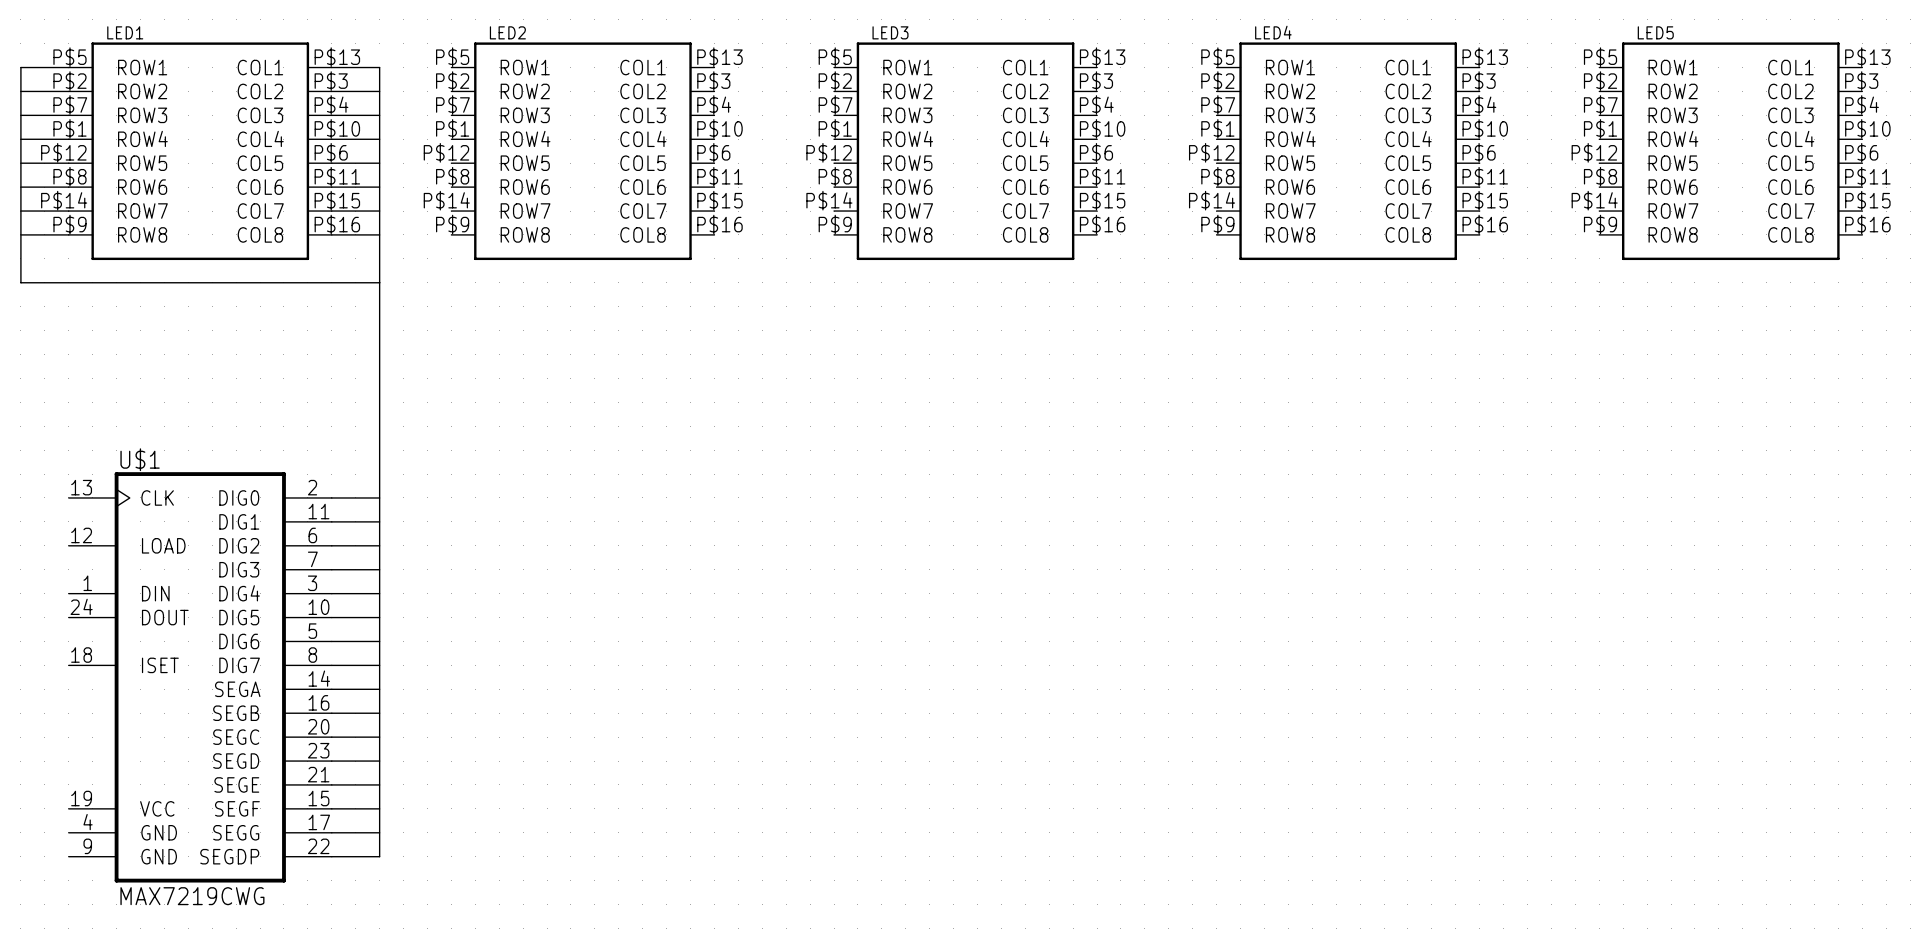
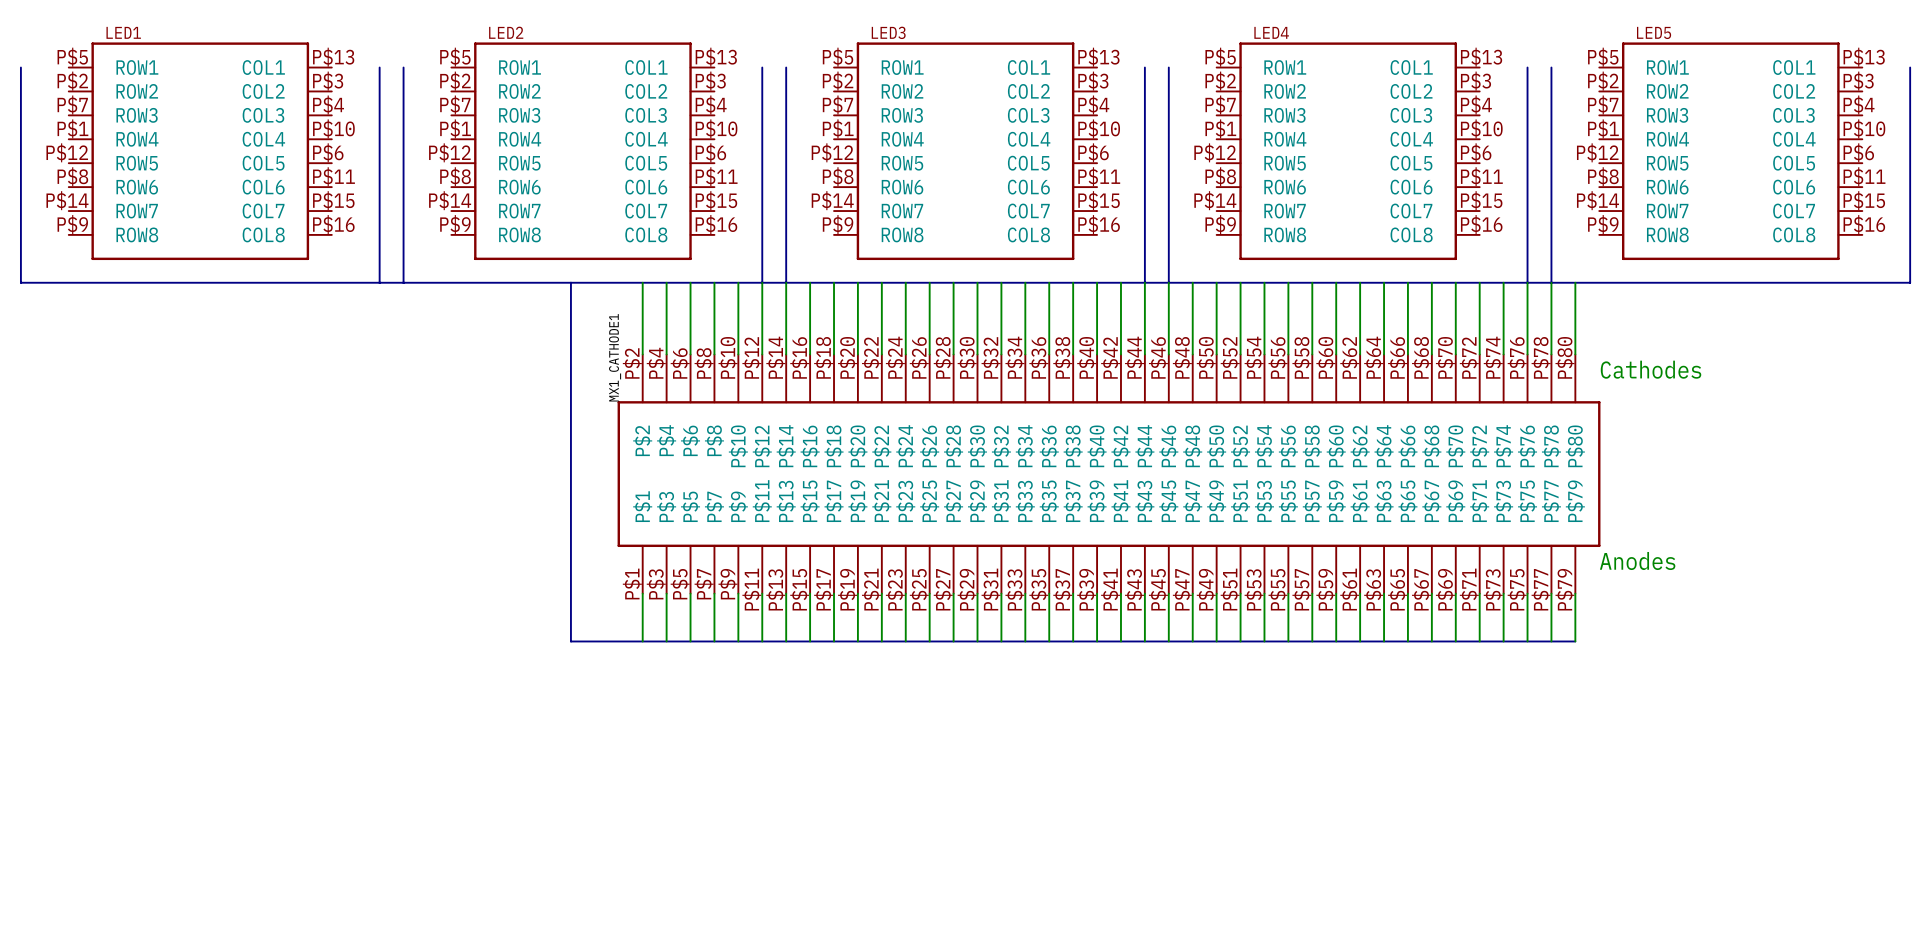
wire: (20, 67) (68, 67) -> none
wire: (331, 67) (379, 67) -> none
bus: none -> (403, 67) (403, 282)
bus: none -> (762, 67) (762, 282)
bus: none -> (786, 67) (786, 282)
bus: none -> (1144, 67) (1144, 282)
bus: none -> (1168, 67) (1168, 282)
bus: none -> (1527, 67) (1527, 282)
bus: none -> (1551, 67) (1551, 282)
wire: (20, 91) (68, 91) -> none
wire: (331, 91) (379, 91) -> none
wire: (20, 115) (68, 115) -> none
wire: (331, 115) (379, 115) -> none
wire: (20, 139) (68, 139) -> none
wire: (331, 139) (379, 139) -> none
wire: (20, 163) (68, 163) -> none
wire: (331, 163) (379, 163) -> none
wire: (20, 187) (68, 187) -> none
wire: (331, 187) (379, 187) -> none
wire: (20, 211) (68, 211) -> none
wire: (331, 211) (379, 211) -> none
wire: (20, 234) (68, 234) -> none
wire: (331, 234) (379, 234) -> none
bus: (379, 282) (379, 856) -> (379, 282) (1910, 282) (1910, 67)
bus: none -> (570, 282) (570, 641) (1575, 641)
wire: none -> (642, 282) (642, 354)
wire: none -> (666, 282) (666, 354)
wire: none -> (690, 282) (690, 354)
wire: none -> (714, 282) (714, 354)
wire: none -> (738, 282) (738, 354)
wire: none -> (762, 282) (762, 354)
wire: none -> (786, 282) (786, 354)
wire: none -> (810, 282) (810, 354)
wire: none -> (834, 282) (834, 354)
wire: none -> (857, 282) (857, 354)
wire: none -> (881, 282) (881, 354)
wire: none -> (905, 282) (905, 354)
wire: none -> (929, 282) (929, 354)
wire: none -> (953, 282) (953, 354)
wire: none -> (977, 282) (977, 354)
wire: none -> (1001, 282) (1001, 354)
wire: none -> (1025, 282) (1025, 354)
wire: none -> (1049, 282) (1049, 354)
wire: none -> (1073, 282) (1073, 354)
wire: none -> (1097, 282) (1097, 354)
wire: none -> (1120, 282) (1120, 354)
wire: none -> (1144, 282) (1144, 354)
wire: none -> (1168, 282) (1168, 354)
wire: none -> (1192, 282) (1192, 354)
wire: none -> (1216, 282) (1216, 354)
wire: none -> (1240, 282) (1240, 354)
wire: none -> (1264, 282) (1264, 354)
wire: none -> (1288, 282) (1288, 354)
wire: none -> (1312, 282) (1312, 354)
wire: none -> (1336, 282) (1336, 354)
wire: none -> (1360, 282) (1360, 354)
wire: none -> (1384, 282) (1384, 354)
wire: none -> (1407, 282) (1407, 354)
wire: none -> (1431, 282) (1431, 354)
wire: none -> (1455, 282) (1455, 354)
wire: none -> (1479, 282) (1479, 354)
wire: none -> (1503, 282) (1503, 354)
wire: none -> (1527, 282) (1527, 354)
wire: none -> (1551, 282) (1551, 354)
wire: none -> (1575, 282) (1575, 354)
label: none -> MX1_CATHODE1 (615, 357)
text: none -> Cathodes (1651, 369)
part: none -> (1109, 474)
wire: (331, 497) (379, 497) -> none
wire: (331, 521) (379, 521) -> none
wire: (331, 545) (379, 545) -> none
text: none -> Anodes (1637, 561)
wire: (331, 569) (379, 569) -> none
wire: (331, 593) (379, 593) -> none
wire: none -> (642, 593) (642, 641)
wire: none -> (666, 593) (666, 641)
wire: none -> (690, 593) (690, 641)
wire: none -> (714, 593) (714, 641)
wire: none -> (738, 593) (738, 641)
wire: none -> (762, 593) (762, 641)
wire: none -> (786, 593) (786, 641)
wire: none -> (810, 593) (810, 641)
wire: none -> (834, 593) (834, 641)
wire: none -> (857, 593) (857, 641)
wire: none -> (881, 593) (881, 641)
wire: none -> (905, 593) (905, 641)
wire: none -> (929, 593) (929, 641)
wire: none -> (953, 593) (953, 641)
wire: none -> (977, 593) (977, 641)
wire: none -> (1001, 593) (1001, 641)
wire: none -> (1025, 593) (1025, 641)
wire: none -> (1049, 593) (1049, 641)
wire: none -> (1073, 593) (1073, 641)
wire: none -> (1097, 593) (1097, 641)
wire: none -> (1120, 593) (1120, 641)
wire: none -> (1144, 593) (1144, 641)
wire: none -> (1168, 593) (1168, 641)
wire: none -> (1192, 593) (1192, 641)
wire: none -> (1216, 593) (1216, 641)
wire: none -> (1240, 593) (1240, 641)
wire: none -> (1264, 593) (1264, 641)
wire: none -> (1288, 593) (1288, 641)
wire: none -> (1312, 593) (1312, 641)
wire: none -> (1336, 593) (1336, 641)
wire: none -> (1360, 593) (1360, 641)
wire: none -> (1384, 593) (1384, 641)
wire: none -> (1407, 593) (1407, 641)
wire: none -> (1431, 593) (1431, 641)
wire: none -> (1455, 593) (1455, 641)
wire: none -> (1479, 593) (1479, 641)
wire: none -> (1503, 593) (1503, 641)
wire: none -> (1527, 593) (1527, 641)
wire: none -> (1551, 593) (1551, 641)
wire: none -> (1575, 593) (1575, 641)
wire: (331, 617) (379, 617) -> none
wire: (331, 641) (379, 641) -> none
wire: (331, 665) (379, 665) -> none
U$1: MAX7219CWG (200, 677) -> none
wire: (331, 689) (379, 689) -> none
wire: (331, 713) (379, 713) -> none
wire: (331, 737) (379, 737) -> none
wire: (331, 761) (379, 761) -> none
wire: (331, 784) (379, 784) -> none
wire: (331, 808) (379, 808) -> none
wire: (331, 832) (379, 832) -> none
wire: (331, 856) (379, 856) -> none

